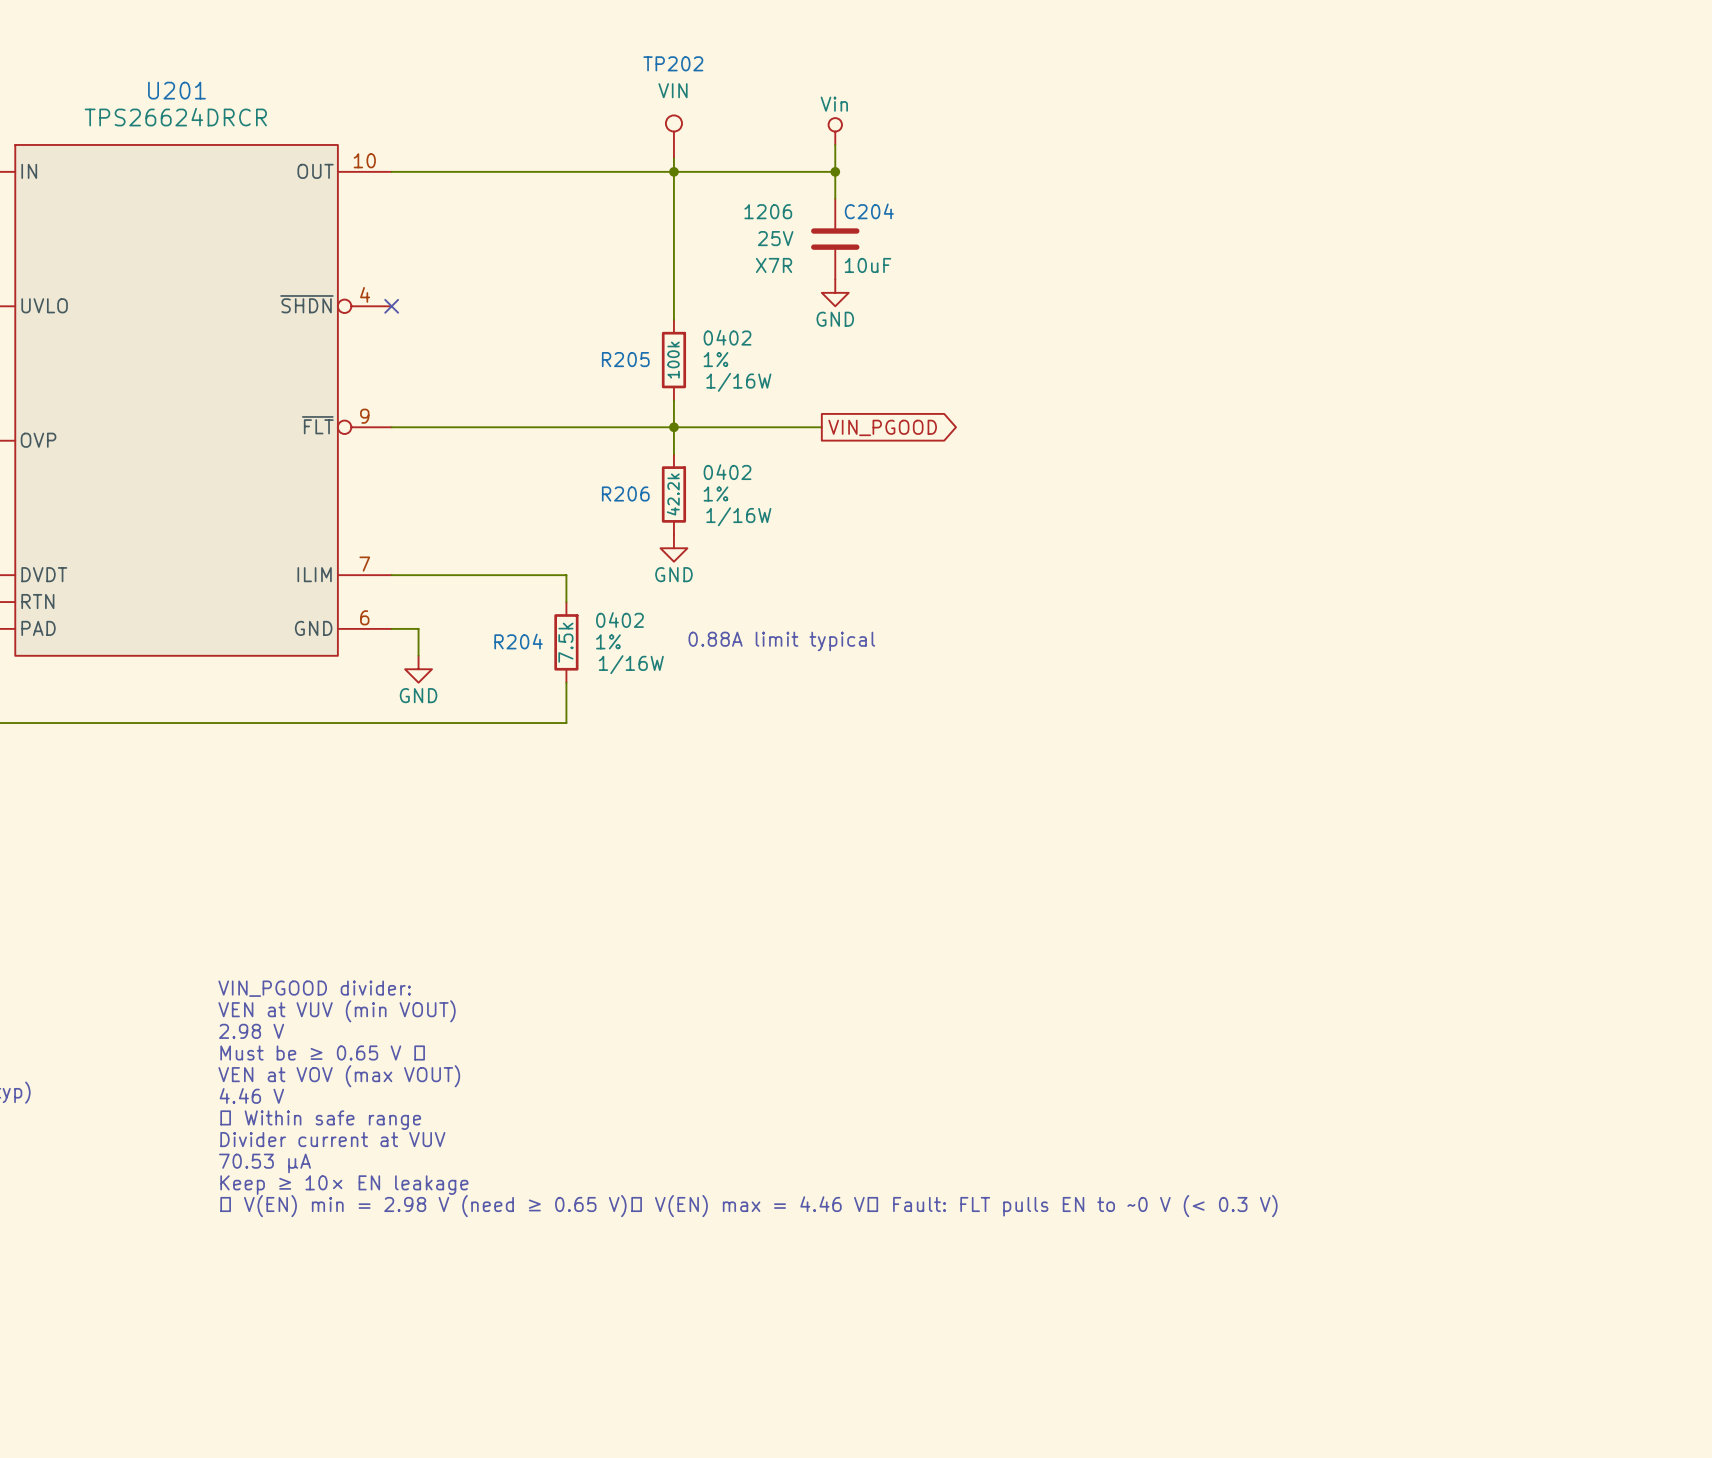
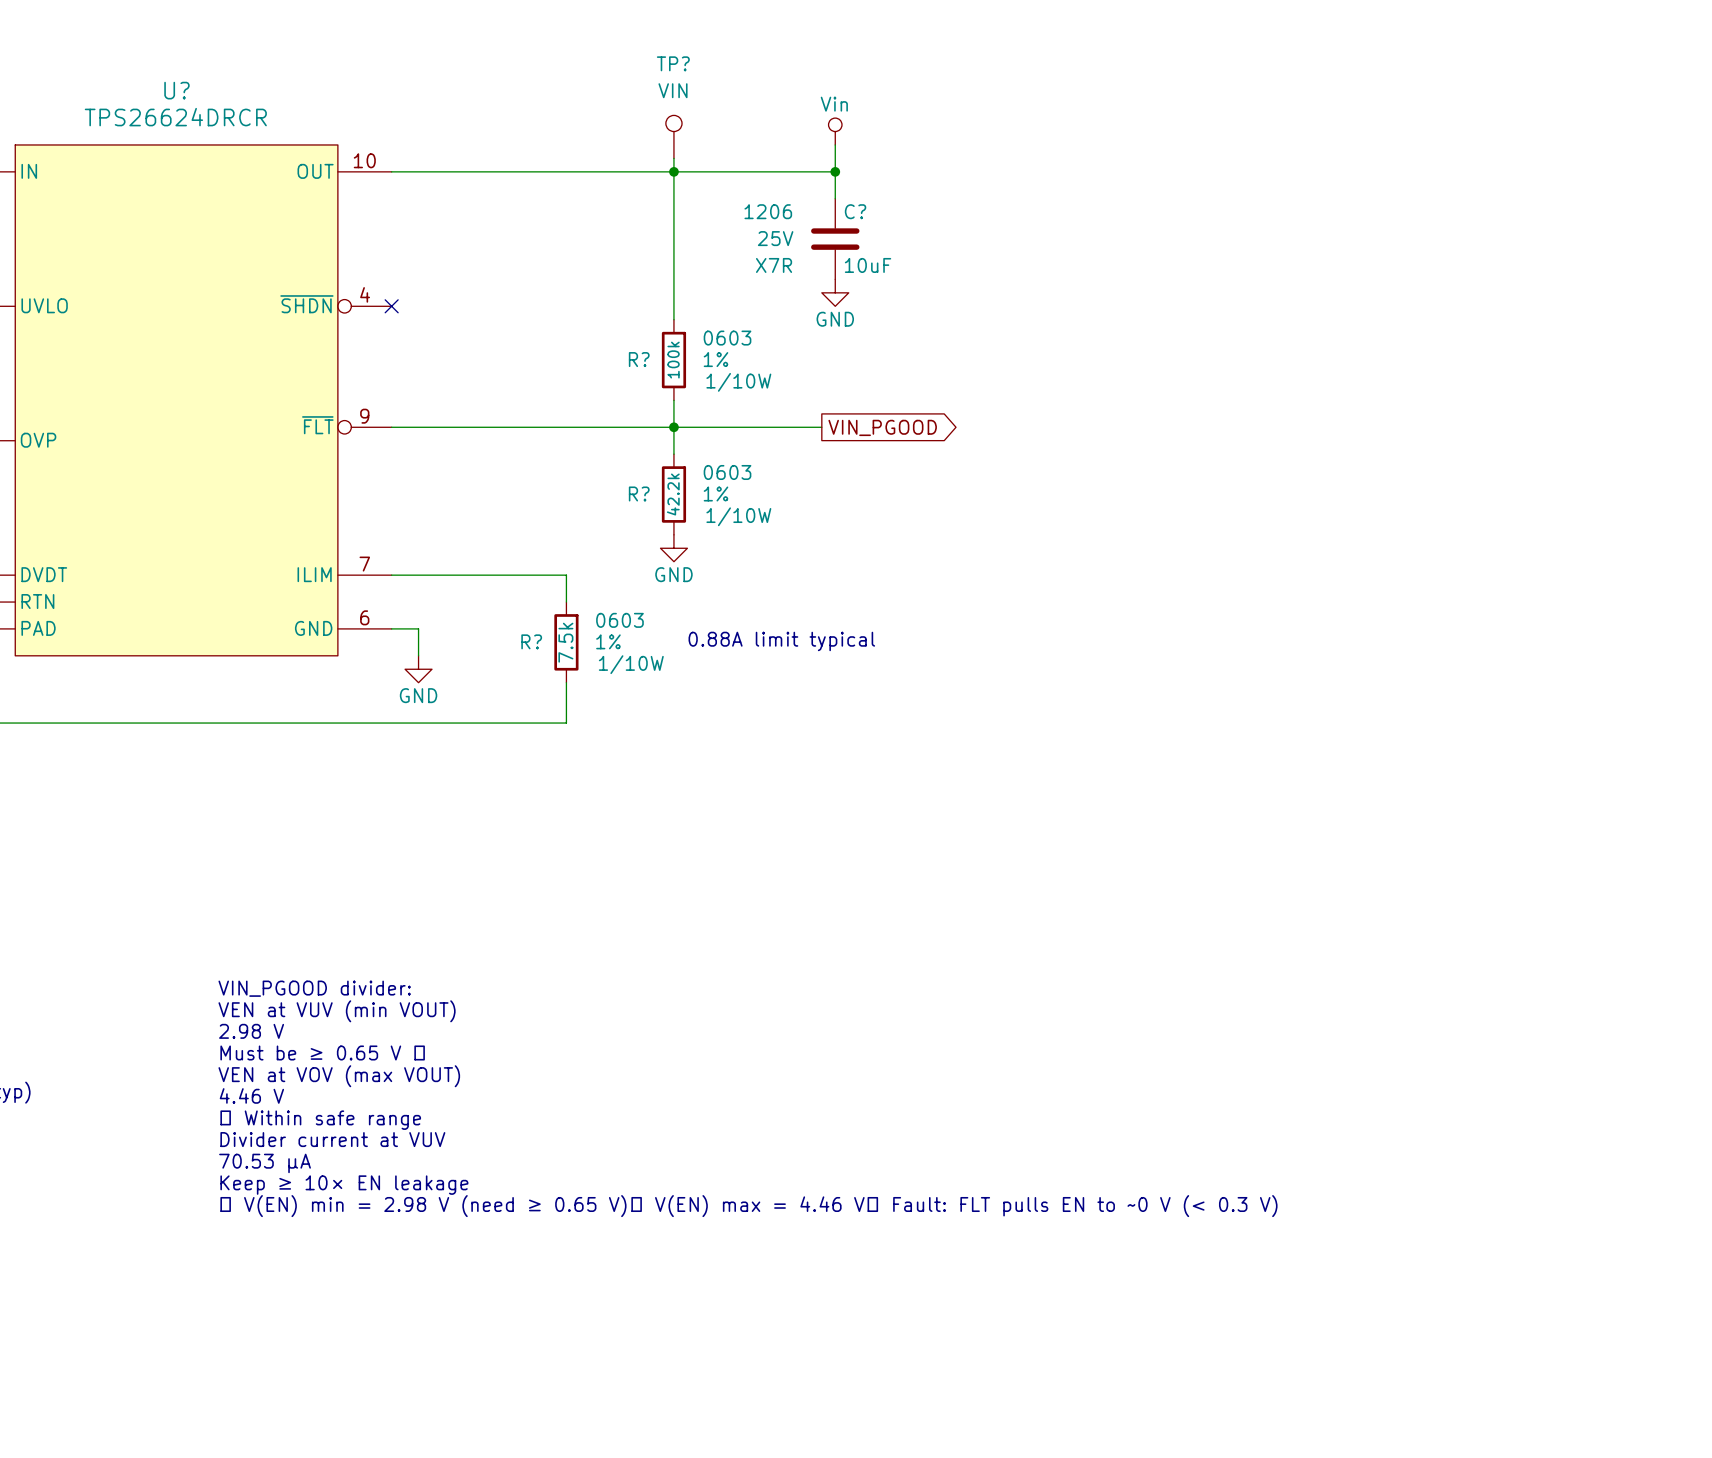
TP202 name: TP202 (673, 63) -> TP? (673, 63)
U201 name: U201 (176, 90) -> U? (176, 90)
C204 name: C204 (869, 211) -> C? (855, 211)
R205 text: 0402 (727, 337) -> 0603 (727, 338)
R205 name: R205 (625, 359) -> R? (639, 359)
R205 text: 1/16W (738, 382) -> 1/10W (738, 382)
R206 text: 0402 (727, 472) -> 0603 (727, 472)
R206 name: R206 (625, 493) -> R? (639, 493)
R206 text: 1/16W (738, 516) -> 1/10W (738, 516)
R204 text: 0402 (619, 620) -> 0603 (619, 620)
R204 name: R204 (518, 641) -> R? (531, 641)
R204 text: 1/16W (631, 664) -> 1/10W (631, 664)

